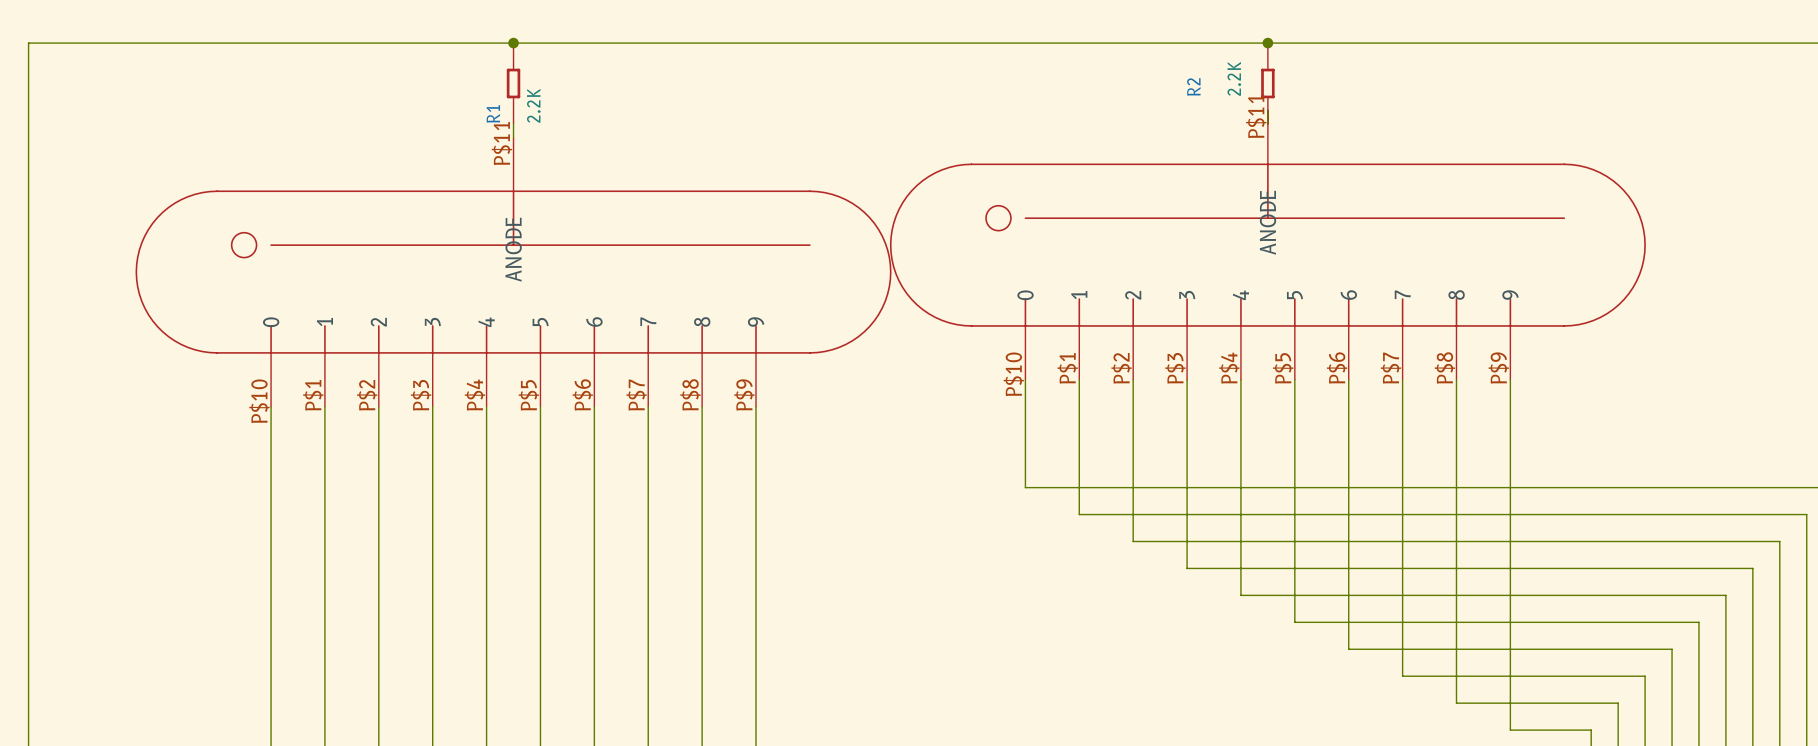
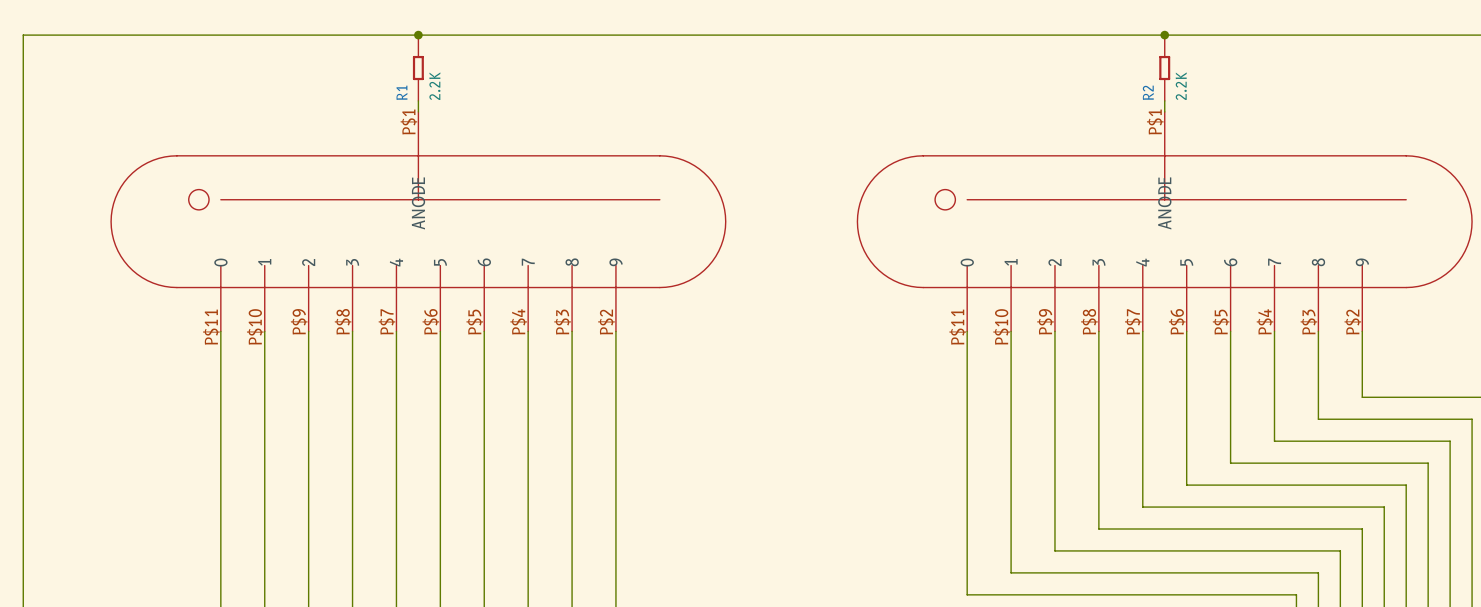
junction: (1267, 43) -> none
junction: none -> (1164, 35)
R2 value position: 2.2K (1234, 78) -> 2.2K (1181, 86)
R2 position: (1267, 83) -> (1164, 68)
R2 name position: R2 (1193, 86) -> R2 (1148, 92)
wire: (1267, 110) (1267, 123) -> (1164, 100) (1164, 111)
part symbol: [135, 137, 892, 407] -> [110, 111, 727, 332]
part: (1267, 245) -> none
part: none -> (1164, 221)
wire: (1025, 379) (1025, 487) (1672, 487) -> (1362, 331) (1362, 397)
wire: (1079, 379) (1079, 514) (1618, 514) -> (1318, 331) (1318, 419)
wire: (1133, 379) (1133, 541) (1564, 541) -> (1274, 331) (1274, 441)
wire: (1187, 568) (1510, 568) (1510, 730) -> (967, 463) (967, 594) (1230, 594)
wire: (1240, 595) (1456, 595) (1456, 703) -> (1011, 485) (1011, 572) (1186, 572)
wire: (1294, 622) (1402, 622) (1402, 676) -> (1054, 507) (1054, 550) (1142, 550)

